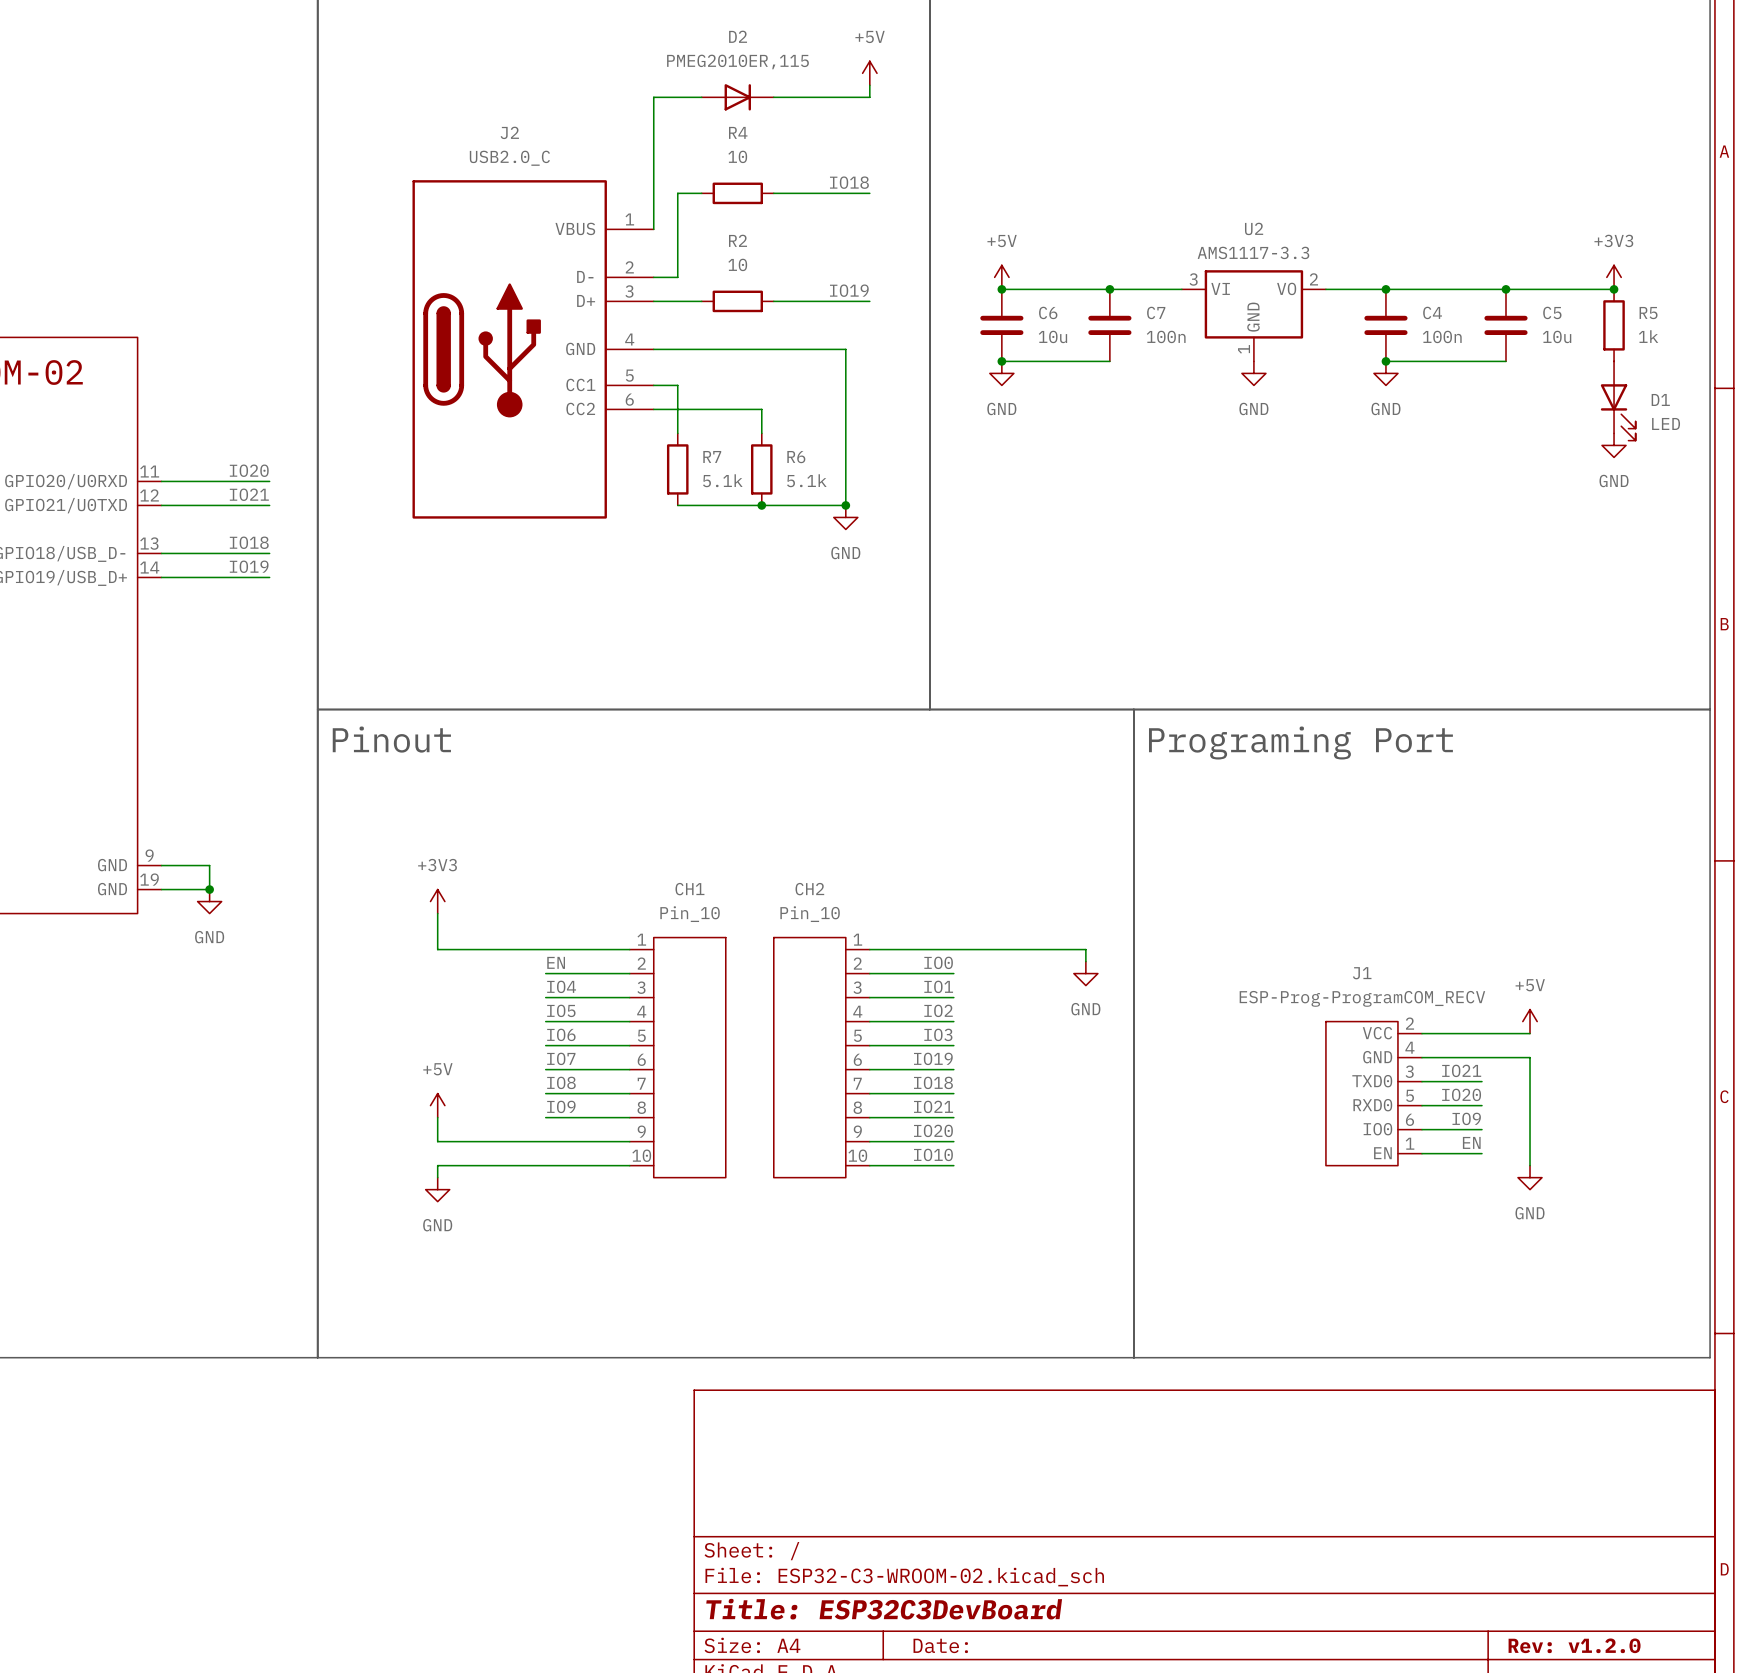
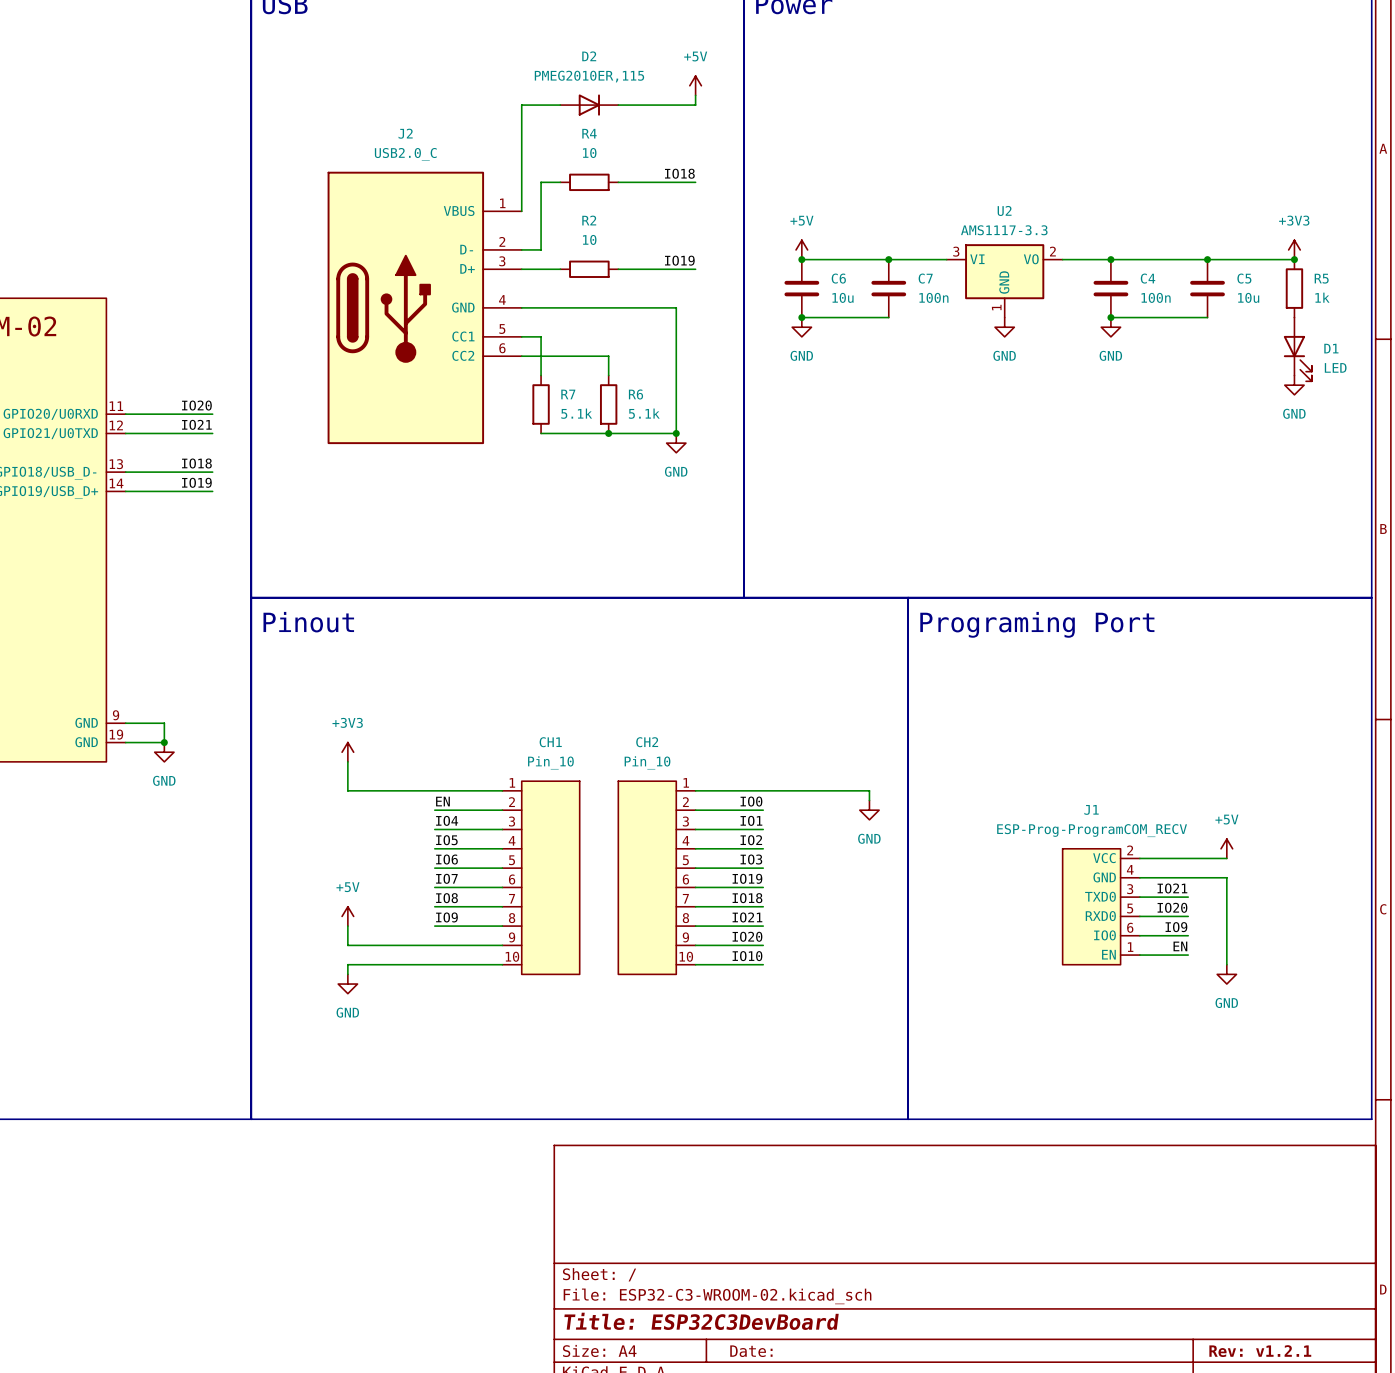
title block: Rev: v1.2.0 (1574, 1645) -> Rev: v1.2.1 (1260, 1351)

